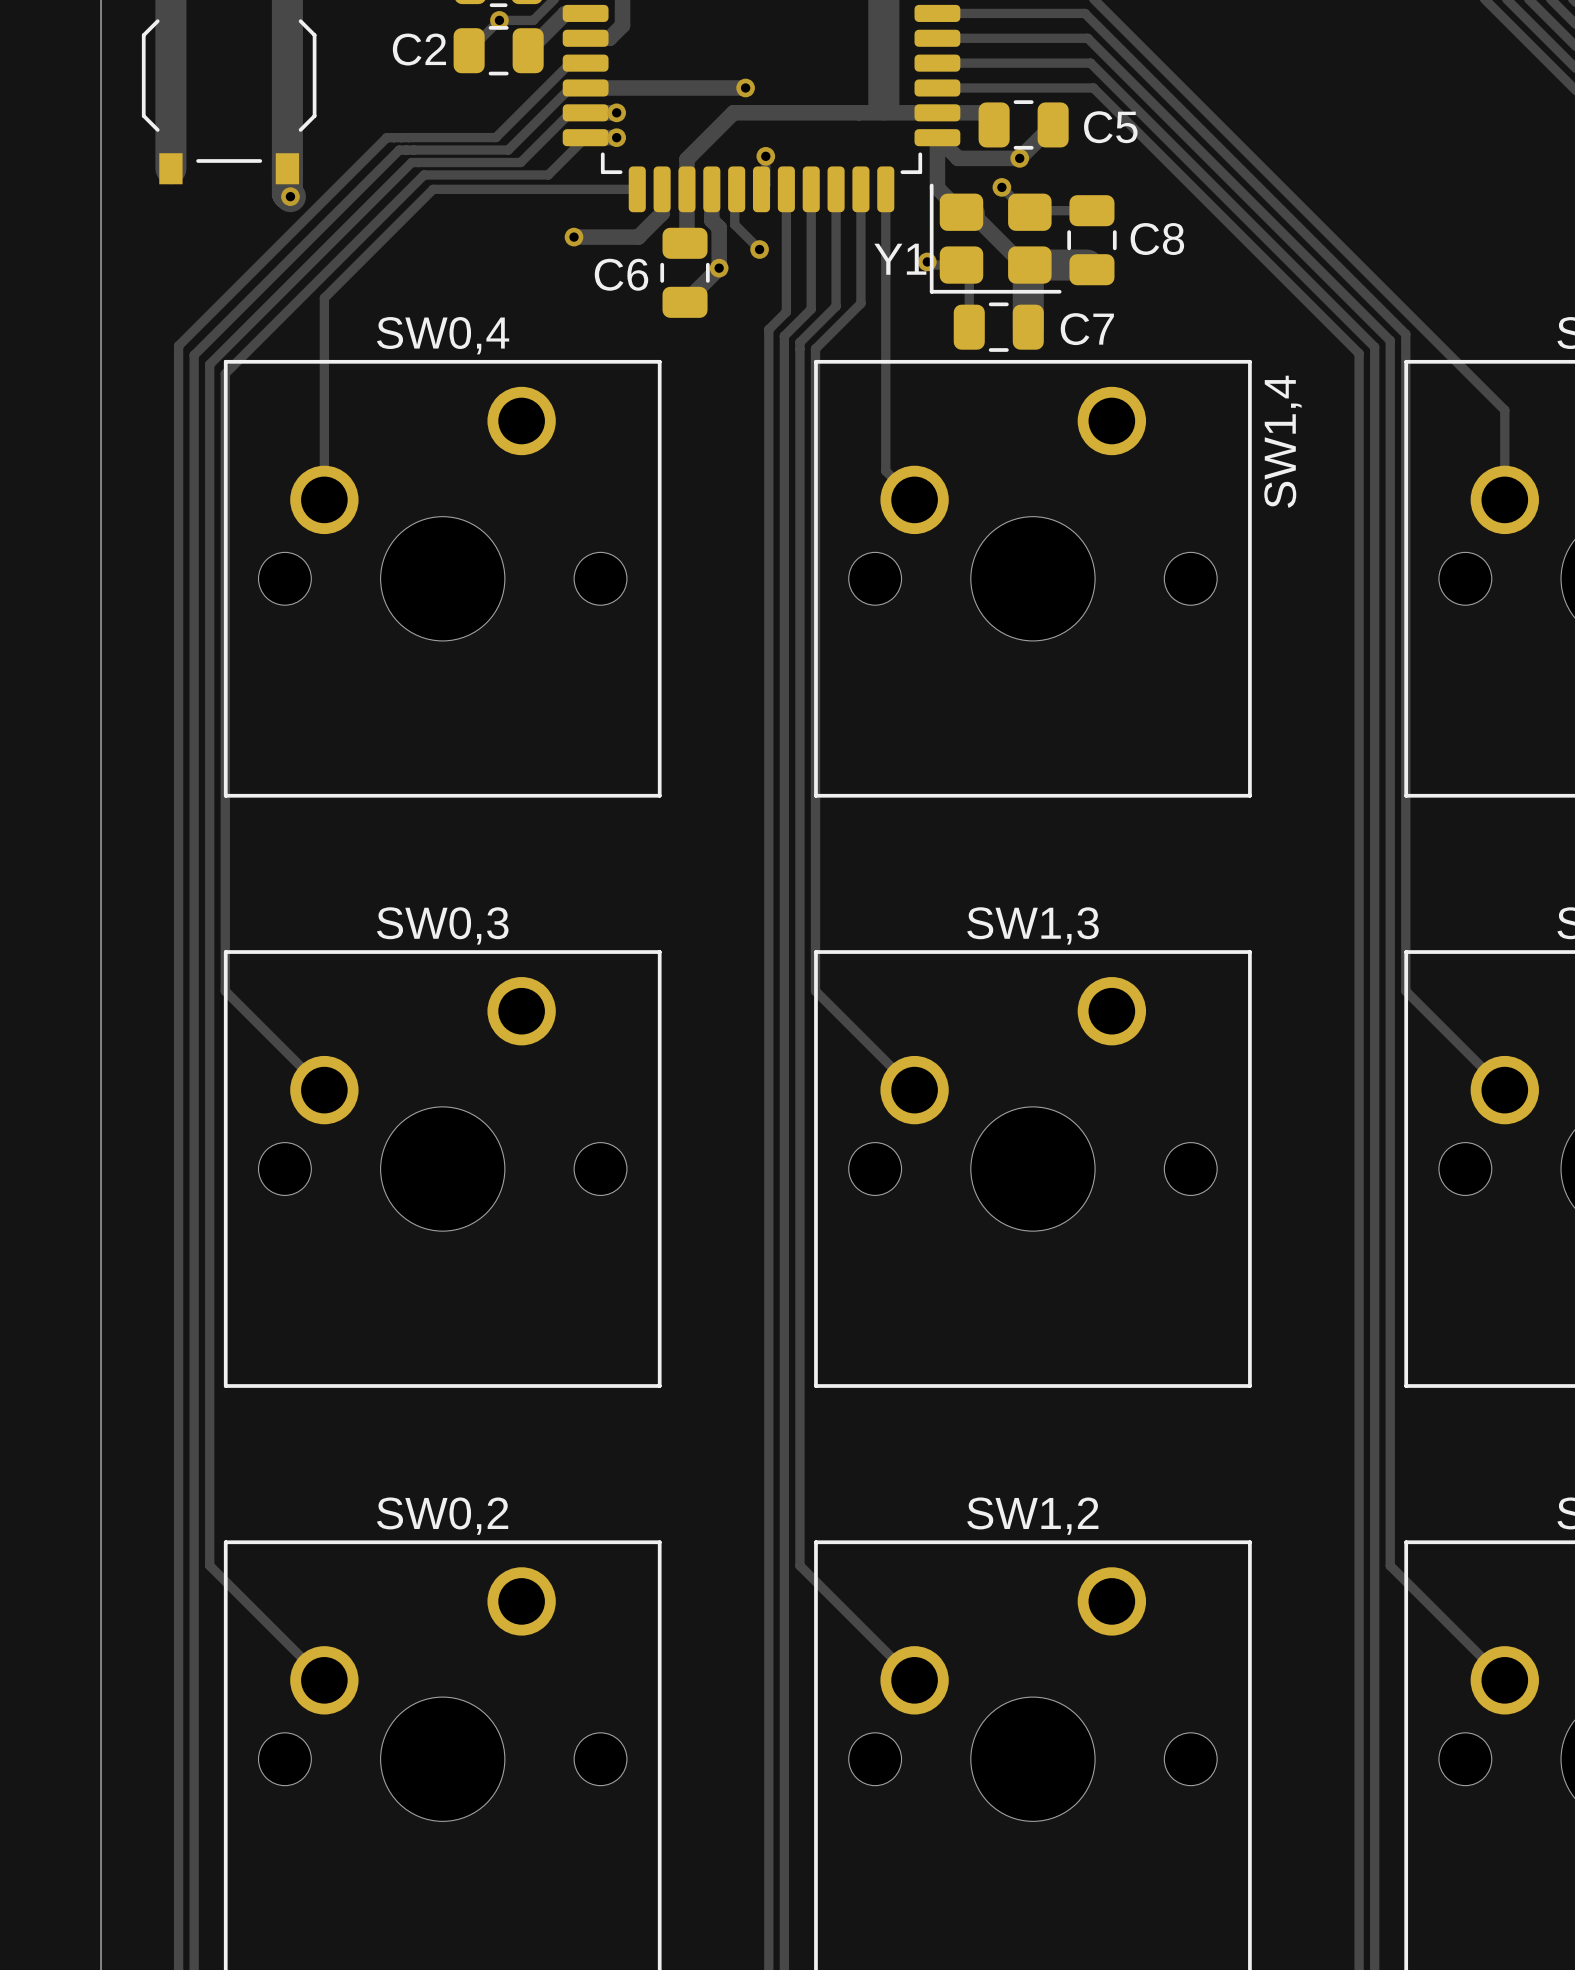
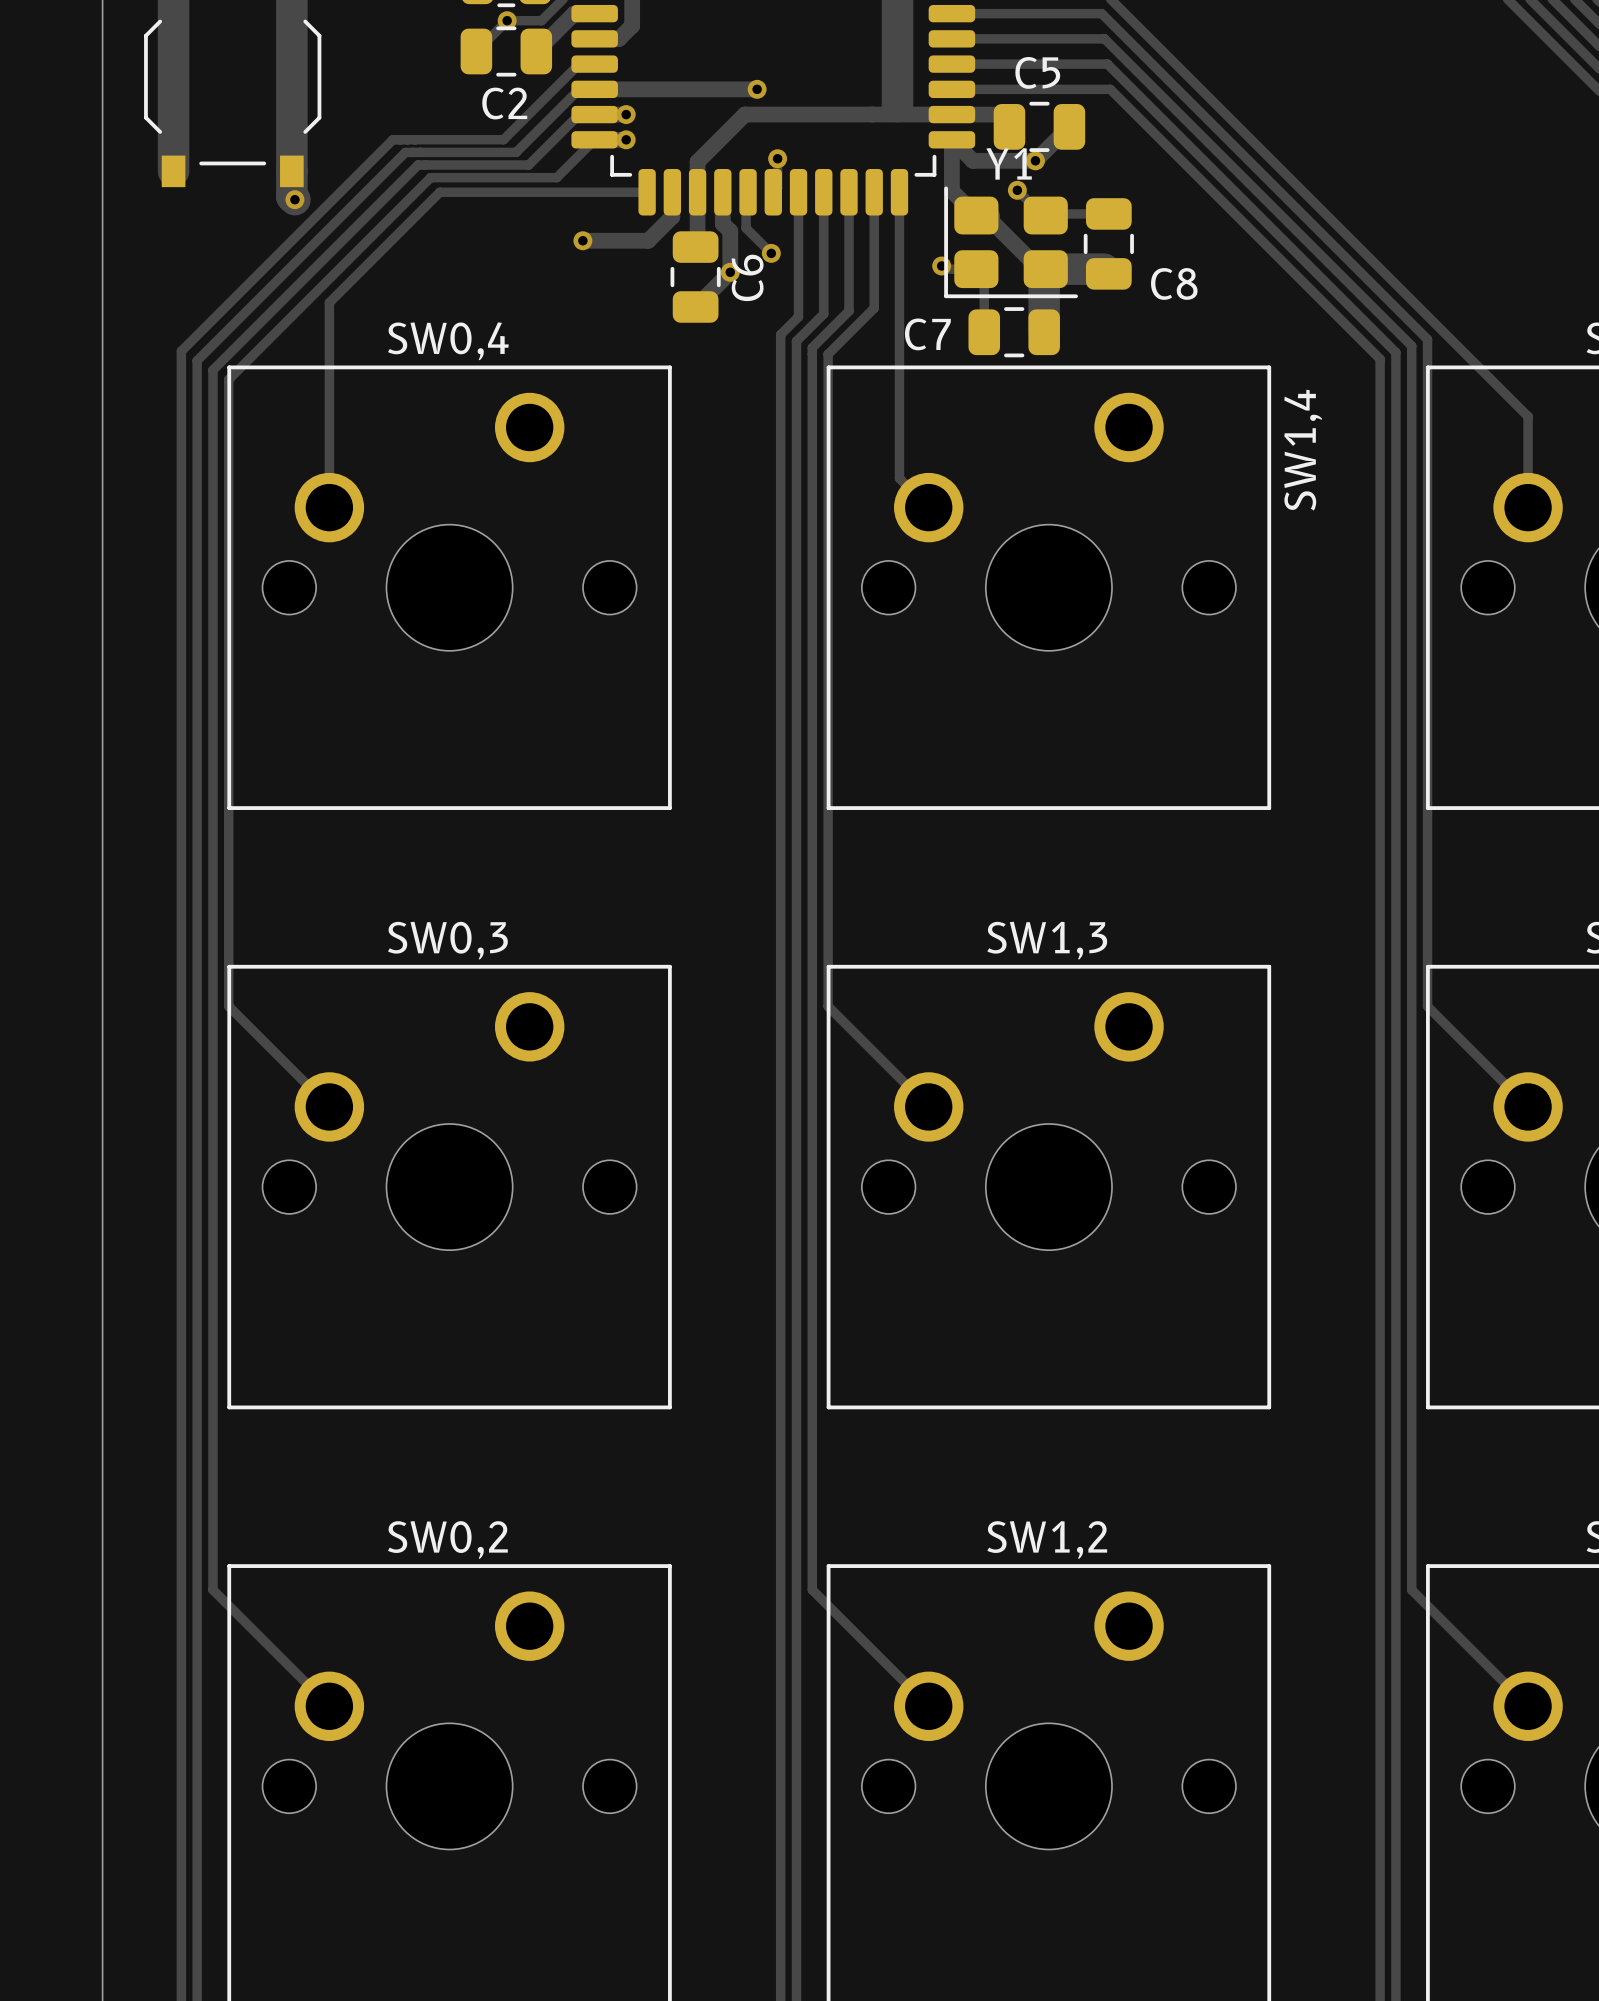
C2 name position: C2 (419, 49) -> C2 (504, 103)
C5 name position: C5 (1110, 127) -> C5 (1037, 72)
C8 name position: C8 (1157, 239) -> C8 (1174, 283)
Y1 name position: Y1 (900, 259) -> Y1 (1009, 163)
C6 name rotation: 0° (621, 274) -> 90° counterclockwise (747, 277)
C6 name position: C6 (621, 274) -> C6 (747, 277)
C7 name position: C7 (1087, 329) -> C7 (927, 334)

